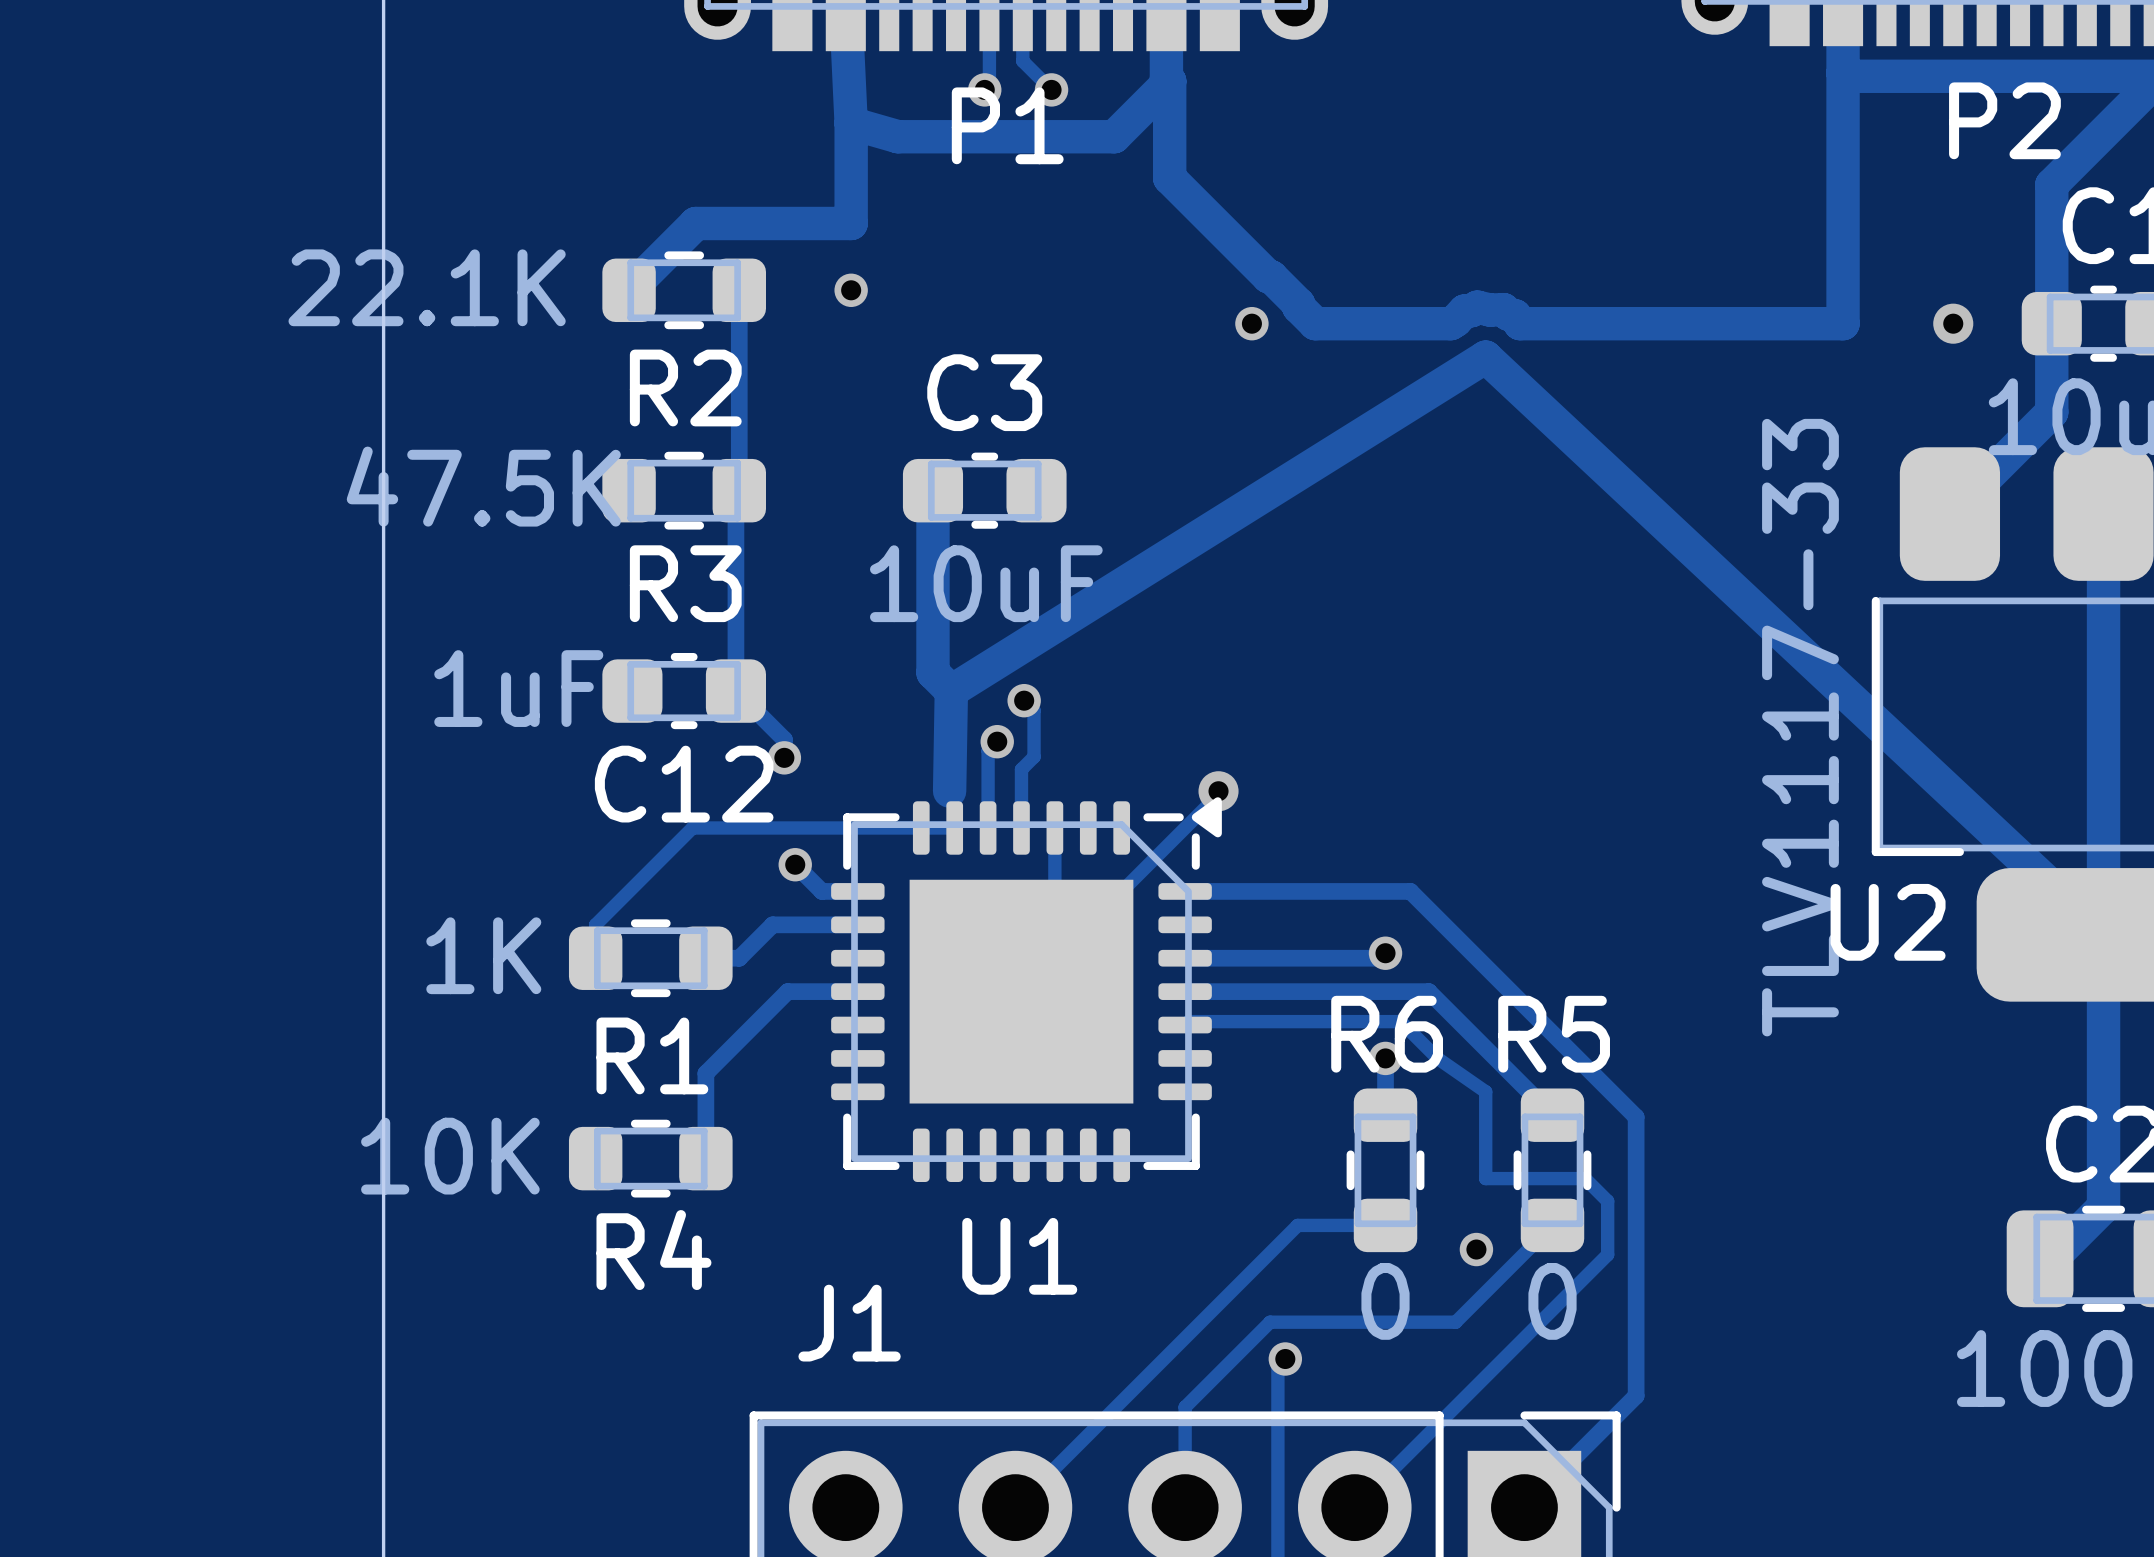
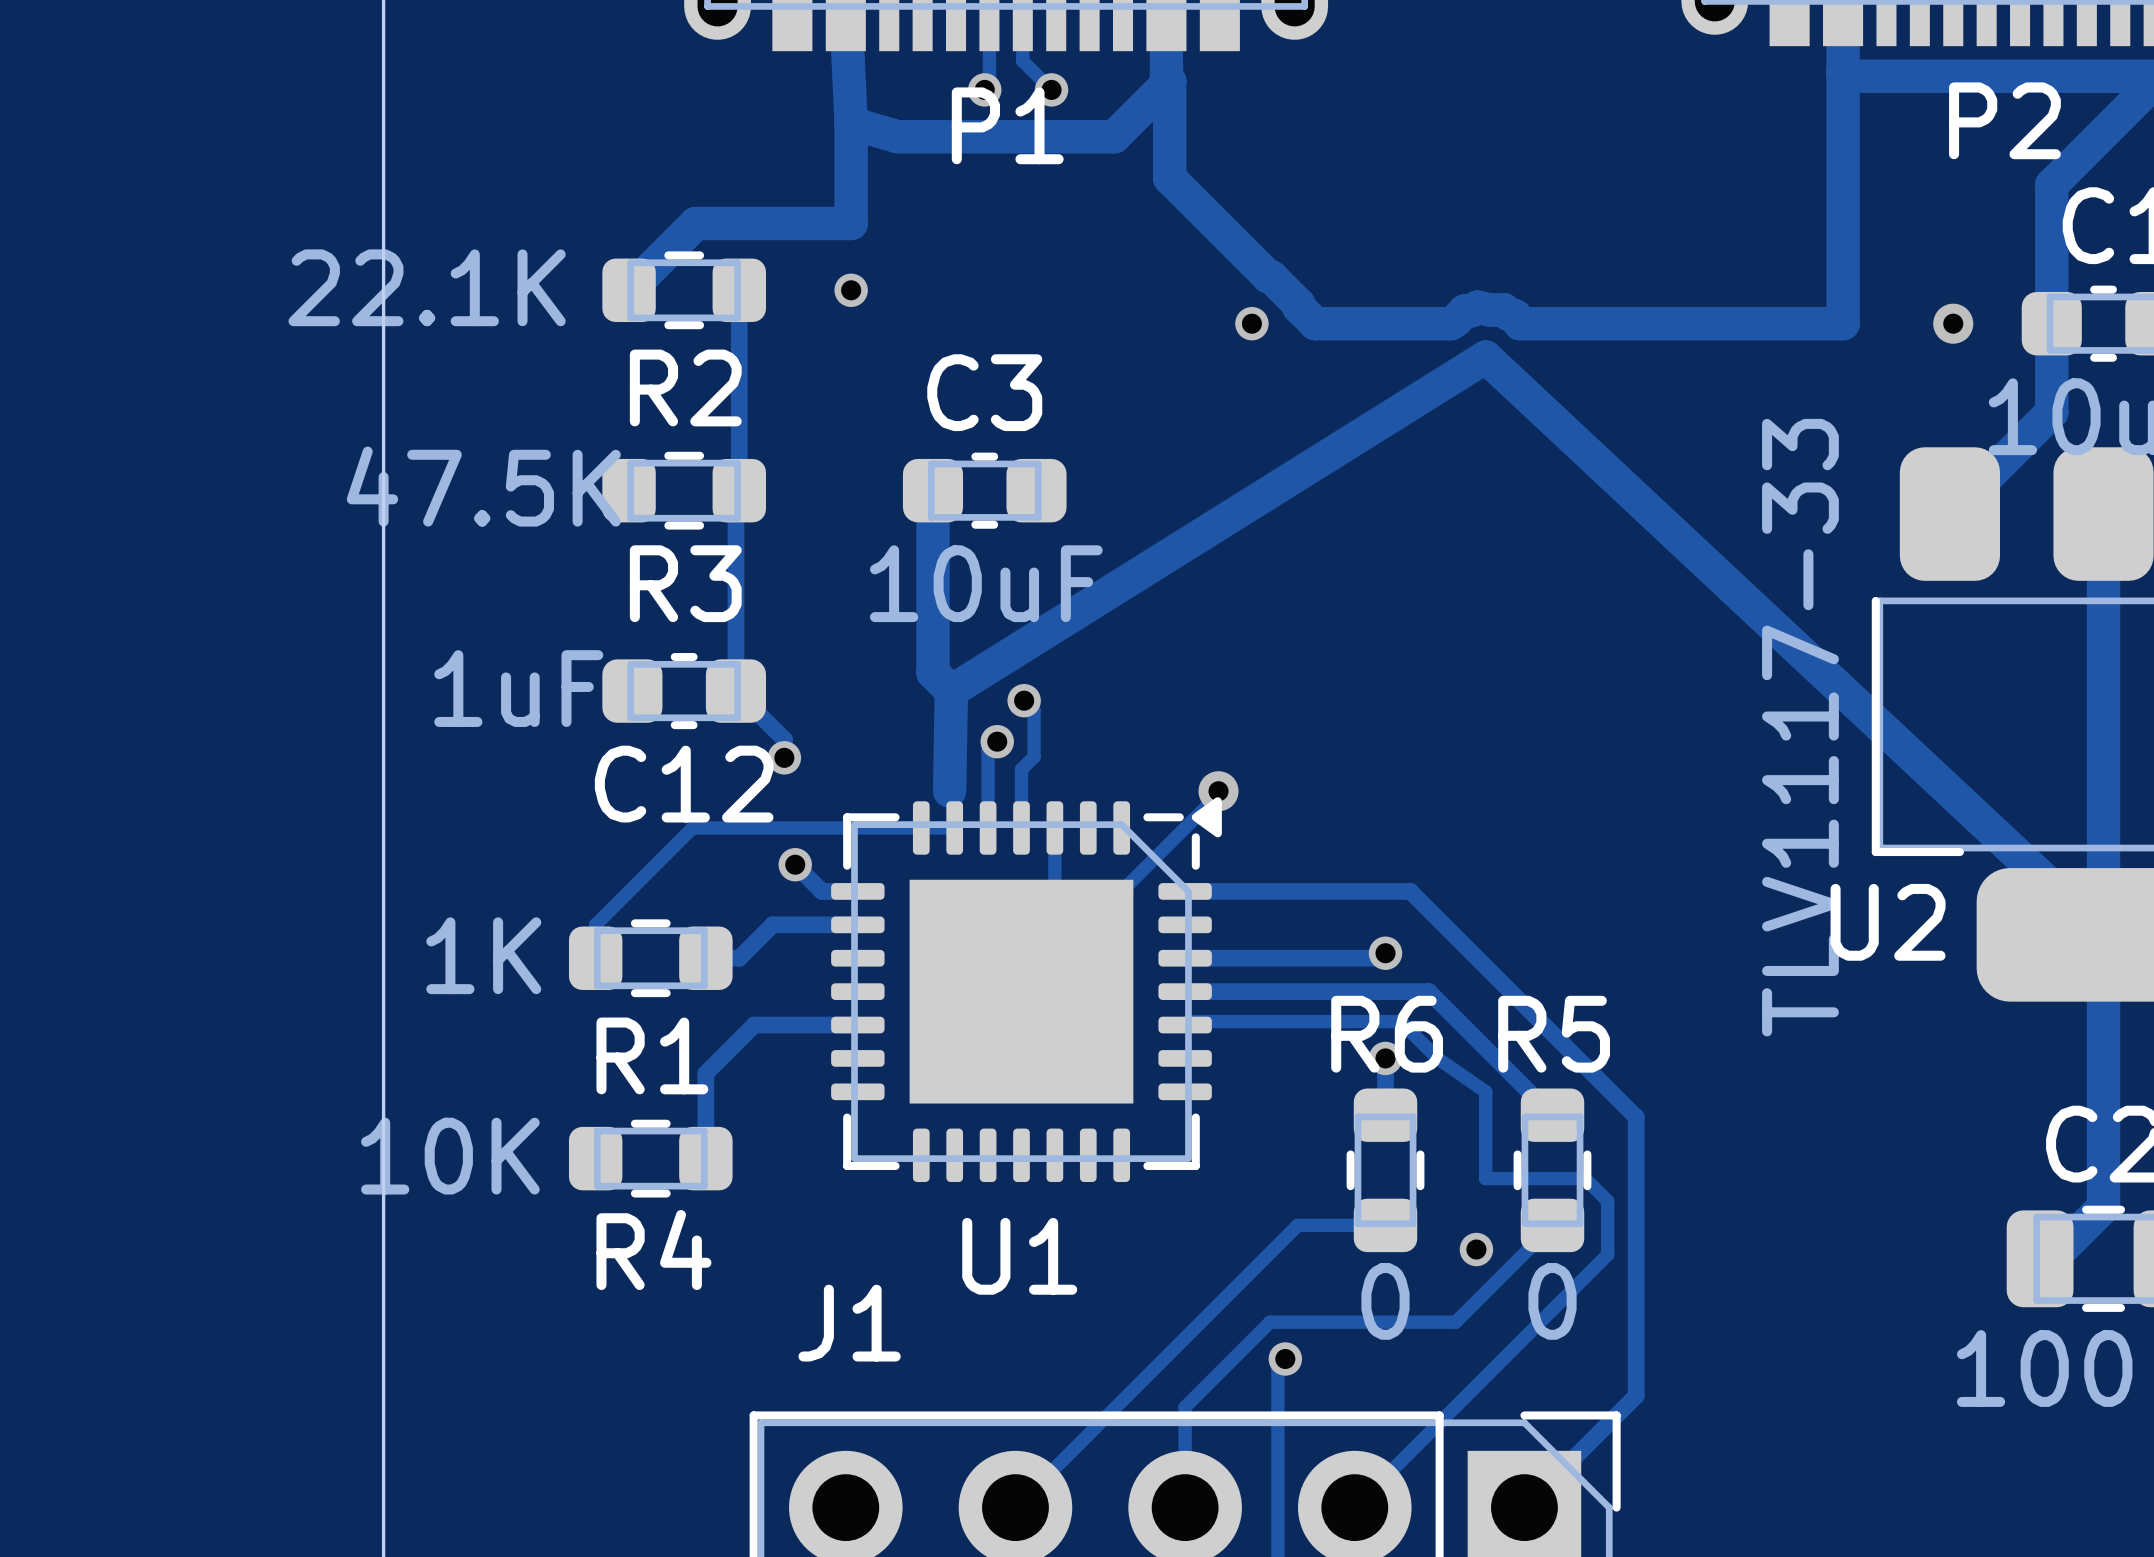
track: (857, 991) (787, 991) (754, 1025) -> (857, 1025) (754, 1025)

